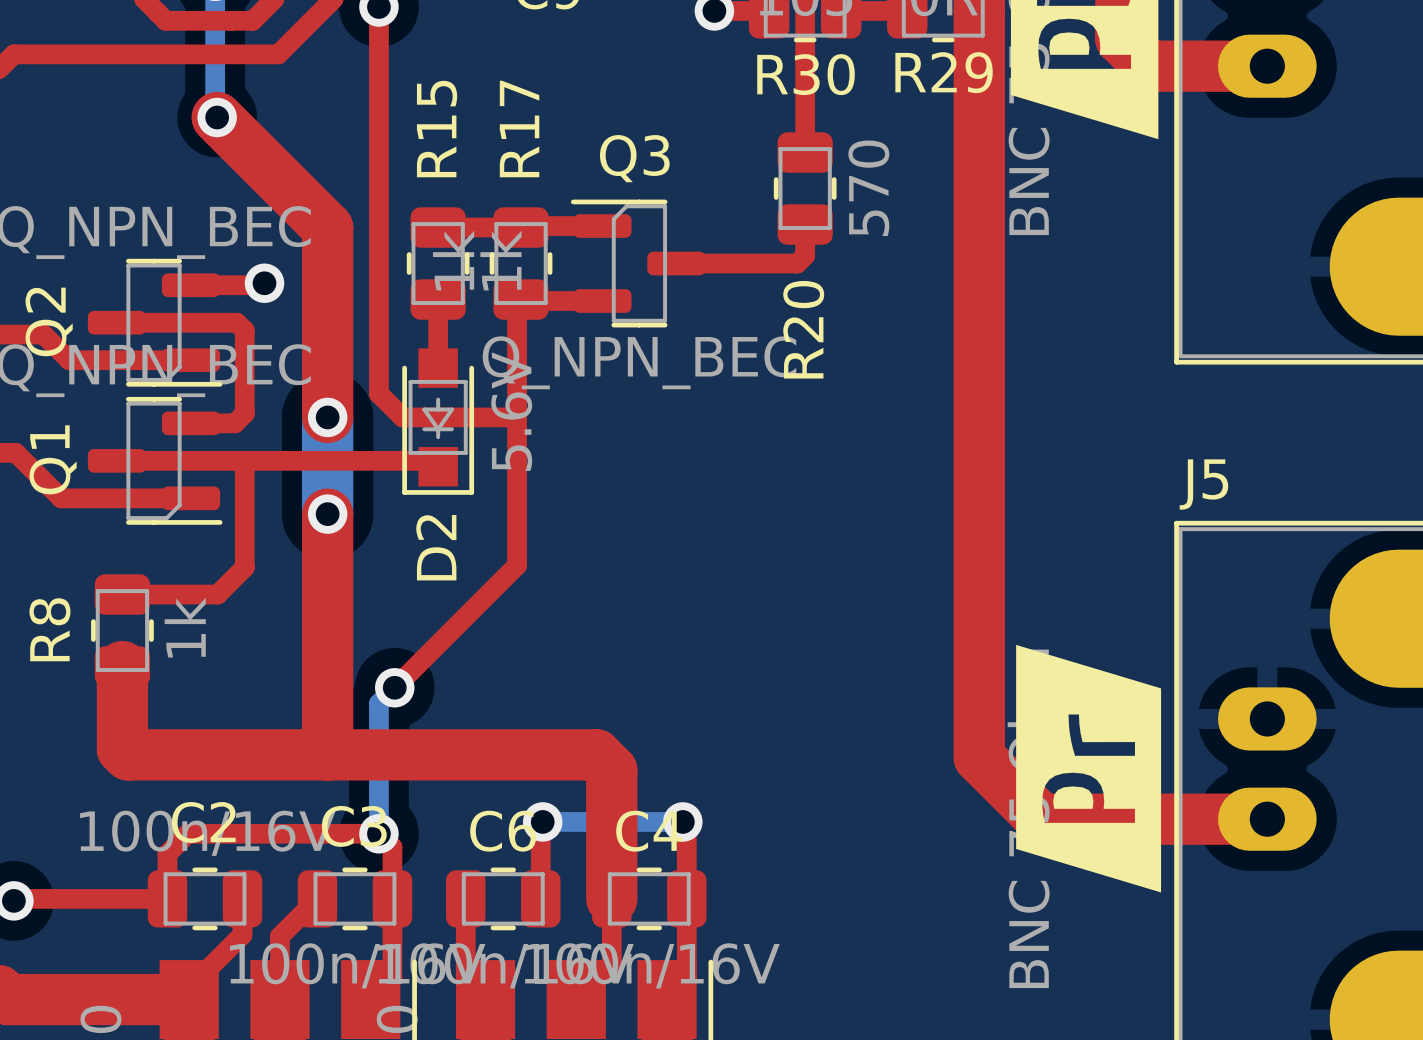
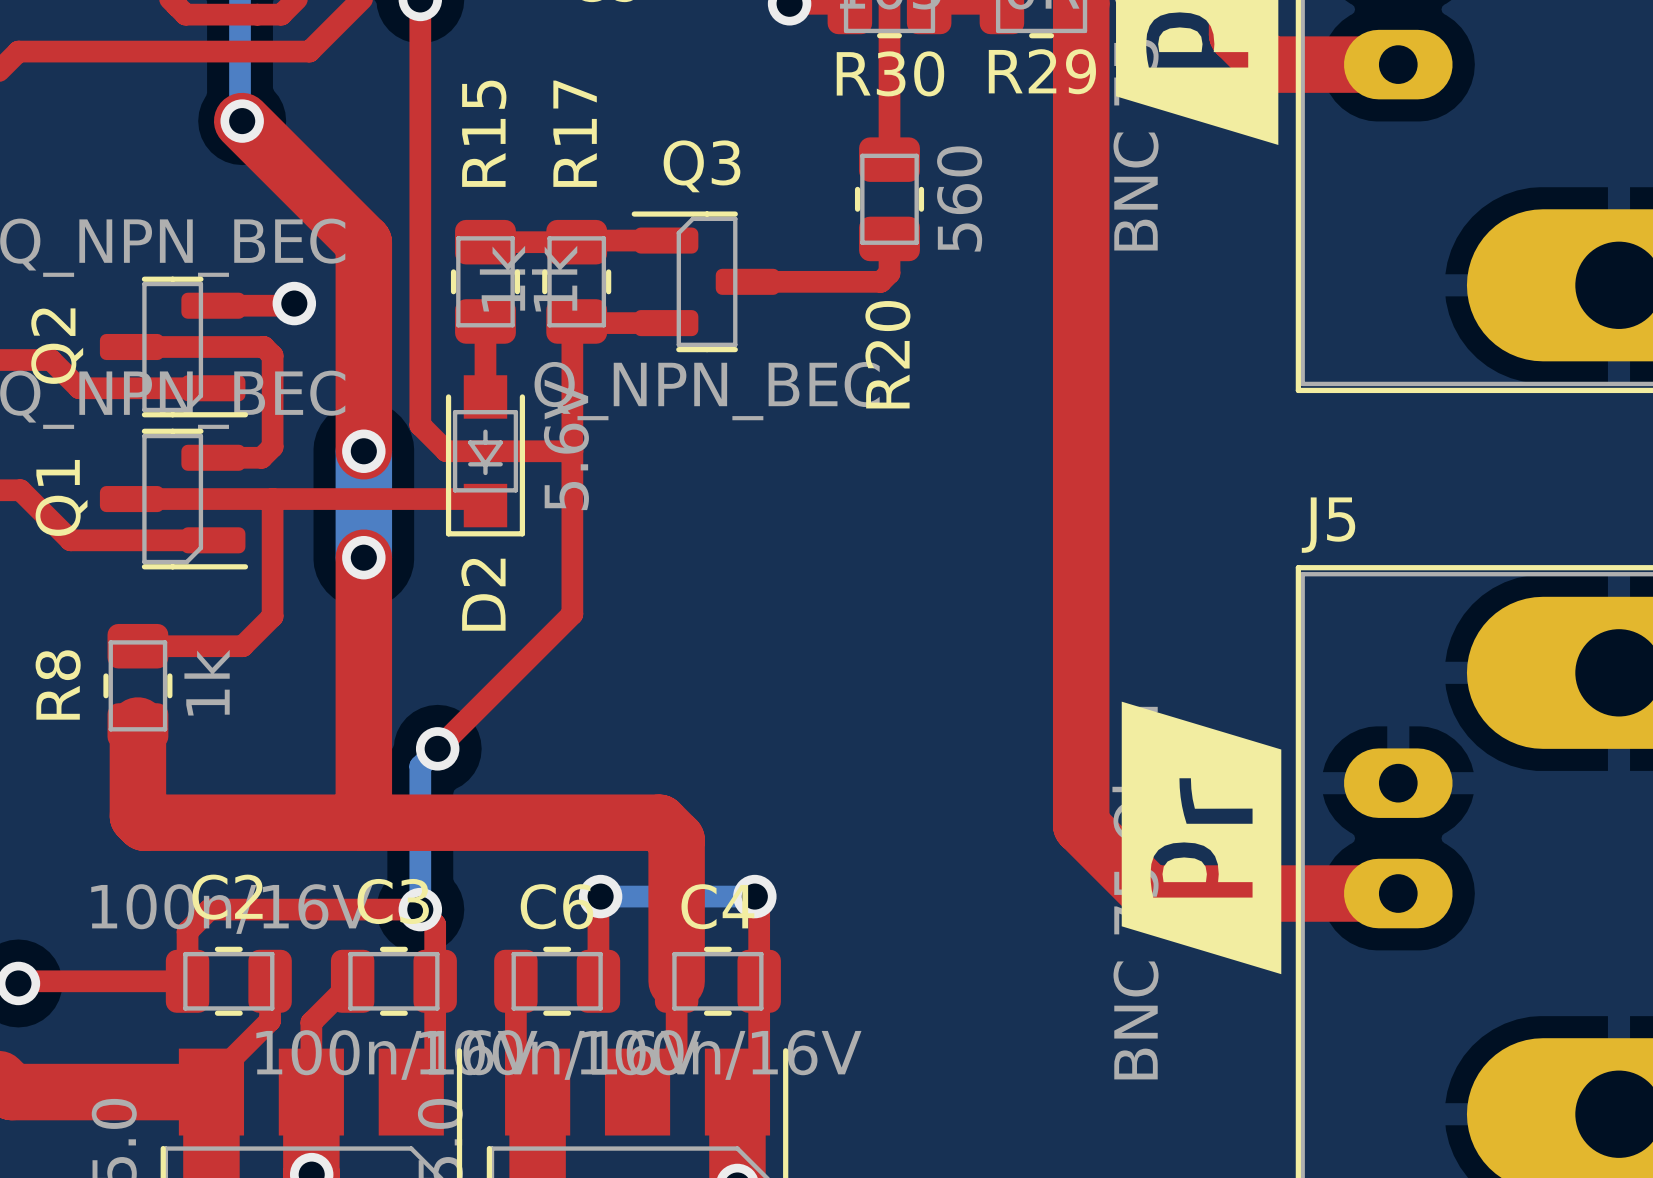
R20 value: 570 (868, 188) -> 560 (959, 198)

